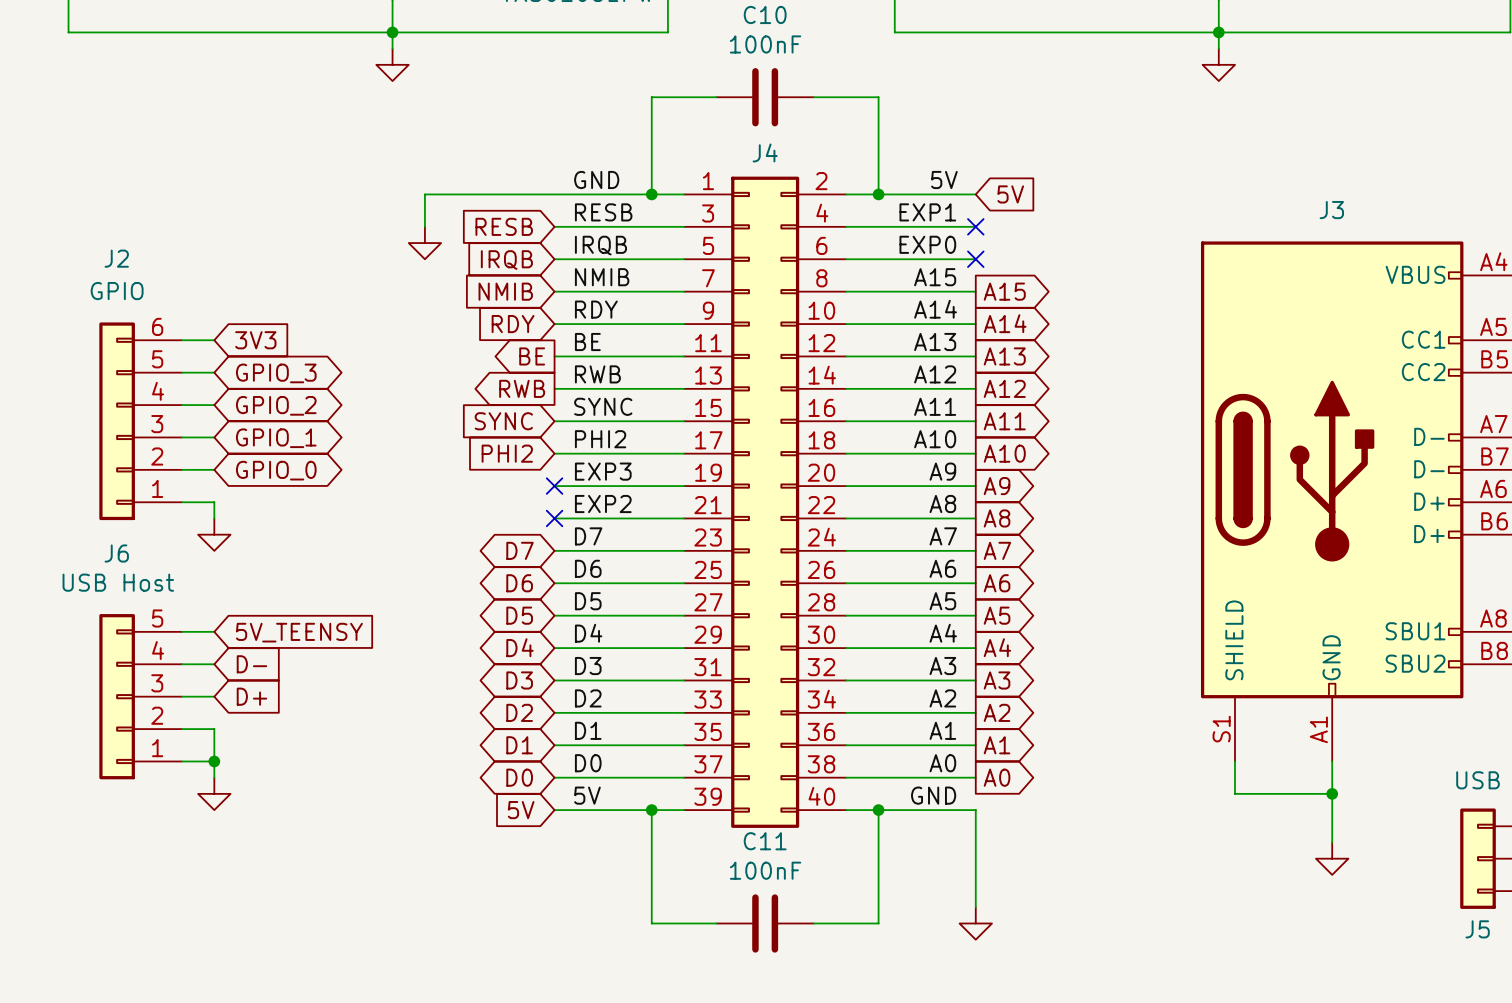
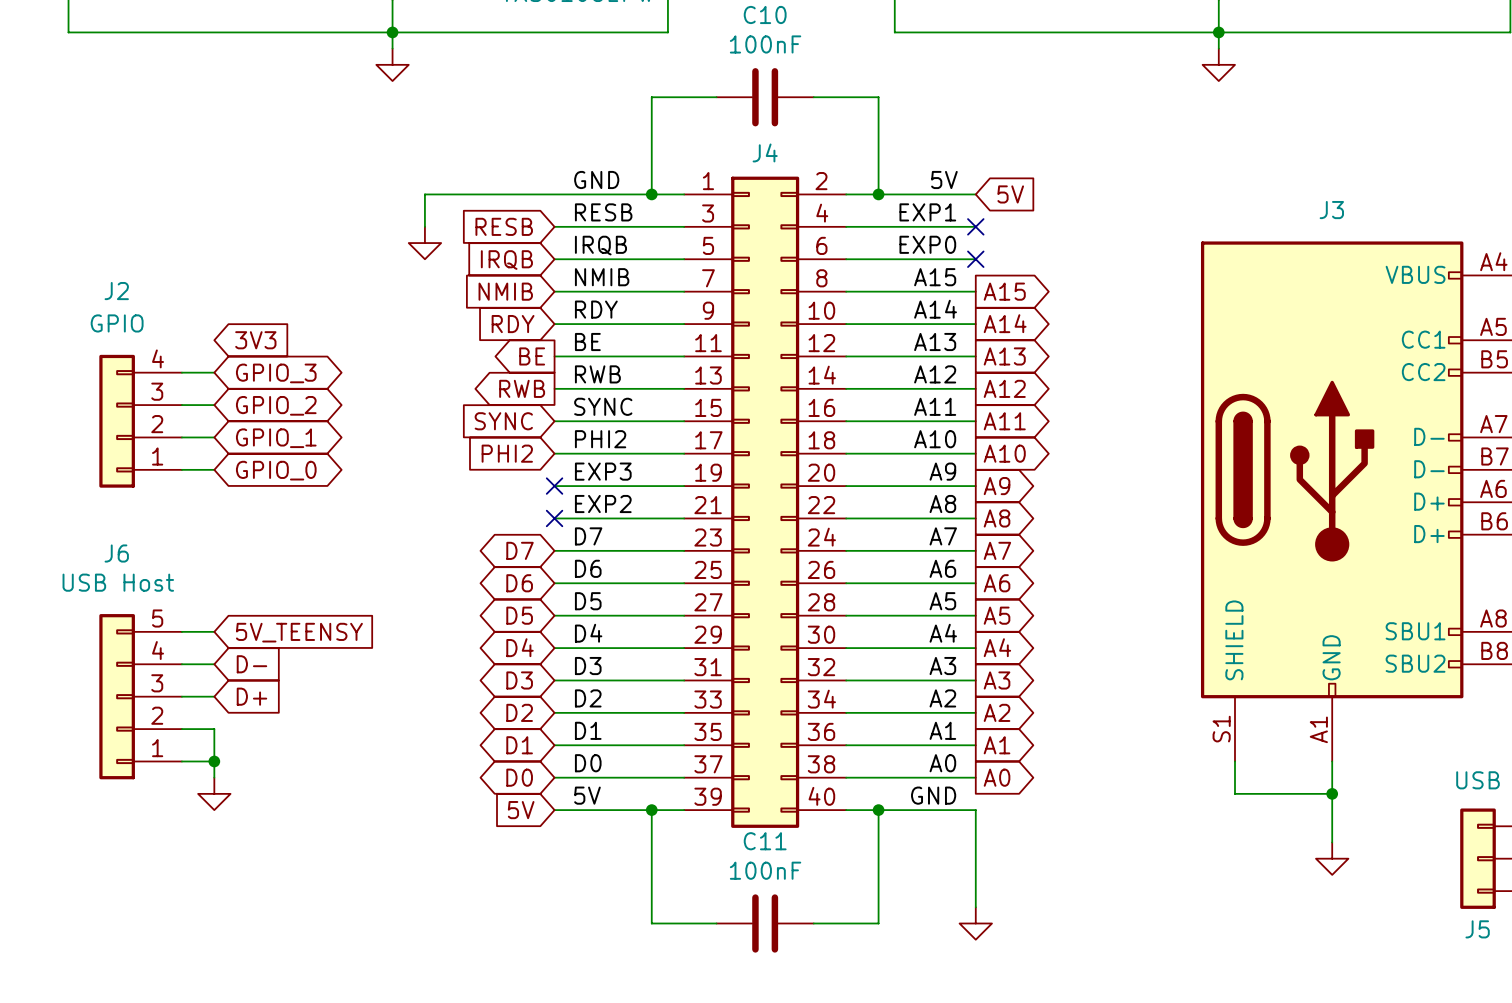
J2 name position: J2 (116, 258) -> J2 (116, 291)
J2 value position: GPIO (117, 291) -> GPIO (117, 323)
J2 symbol: [99, 322, 182, 521] -> [99, 354, 182, 488]
wire: (181, 340) (214, 340) -> none
wire: (181, 502) (214, 502) (214, 518) -> none
power symbol: (214, 534) -> none

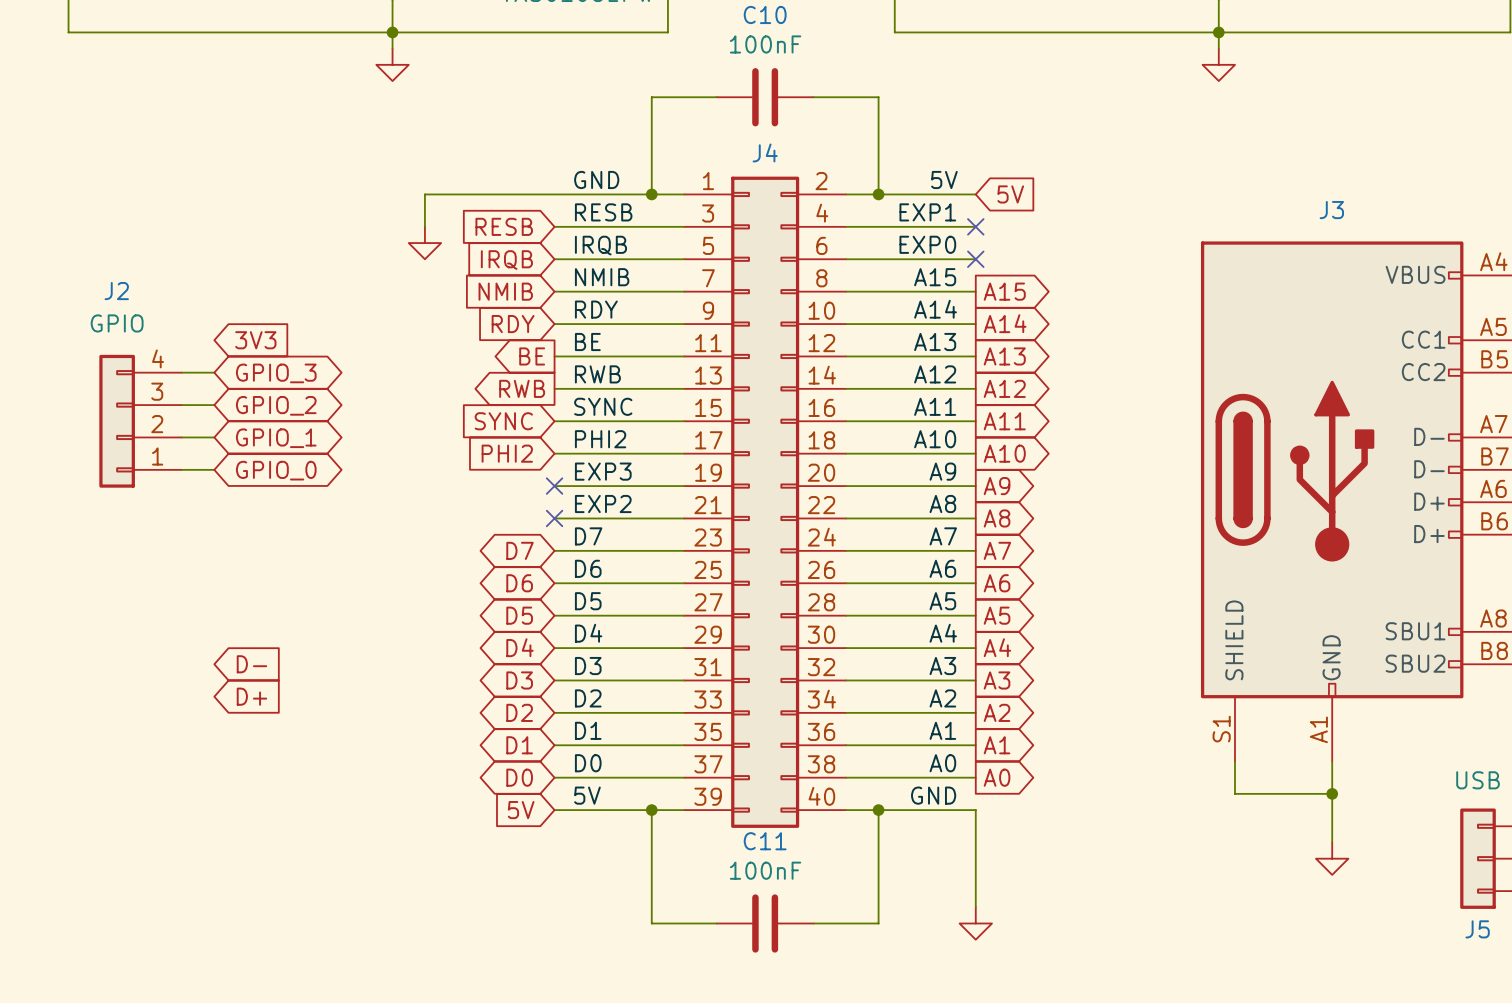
wire: (181, 631) (214, 631) -> none
global label: 5V_TEENSY (299, 632) -> none
wire: (181, 664) (214, 664) -> none
J6: USB Host (140, 696) -> none
wire: (181, 696) (214, 696) -> none
wire: (181, 729) (214, 729) (214, 777) -> none
wire: (181, 761) (214, 761) -> none
junction: (214, 761) -> none
power symbol: (214, 793) -> none

